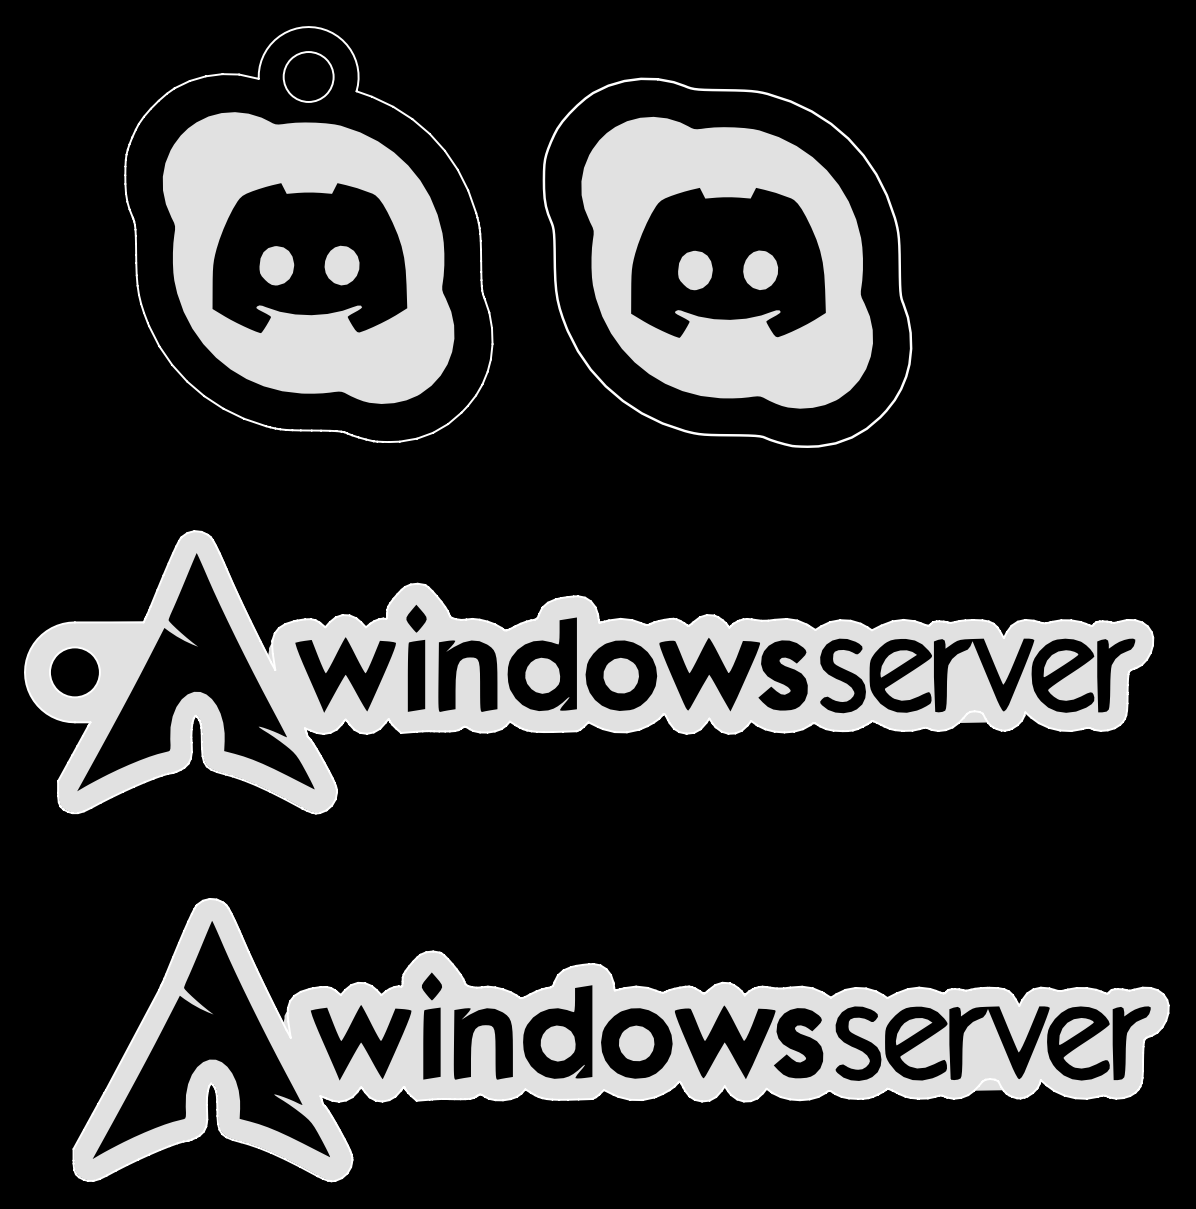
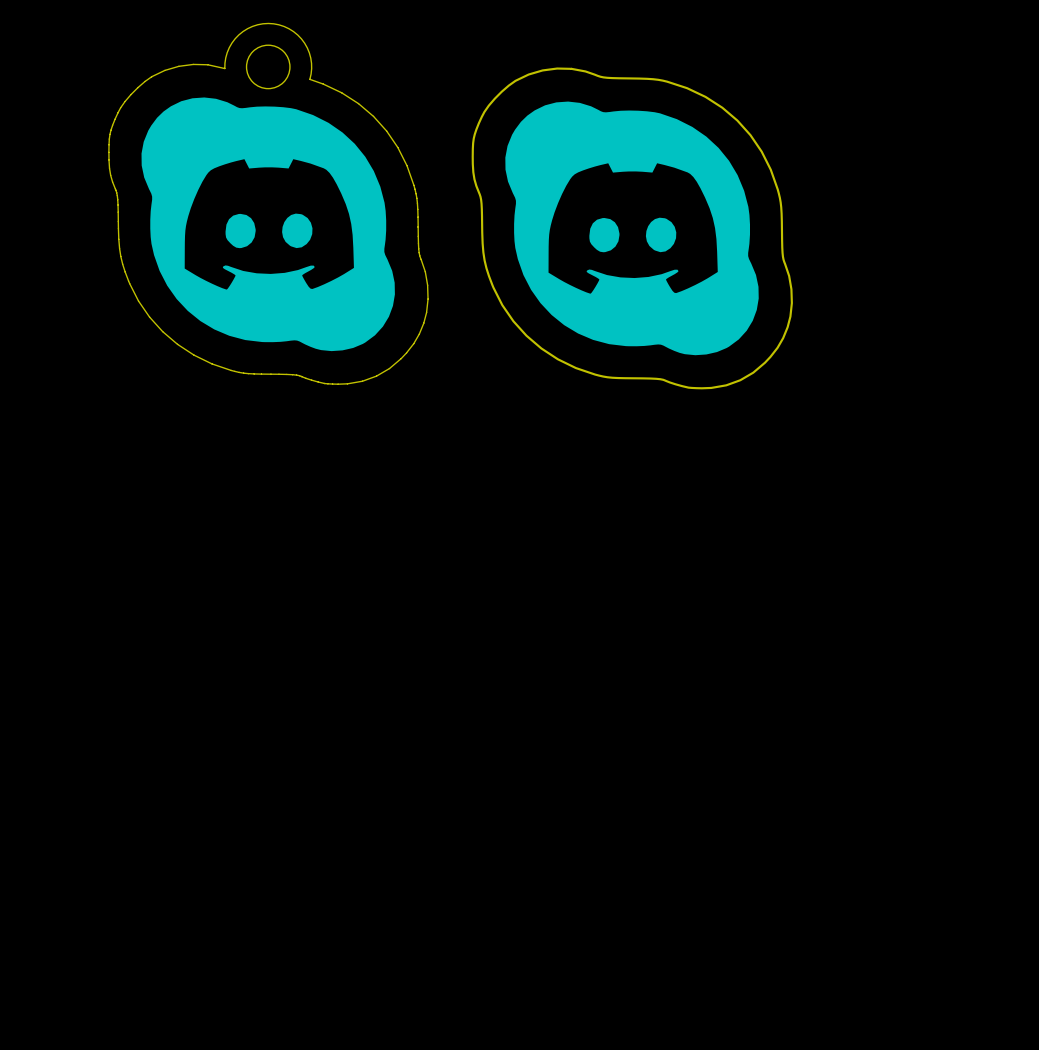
drawing: [24, 530, 1154, 815] -> none
drawing: [72, 898, 1170, 1182] -> none

